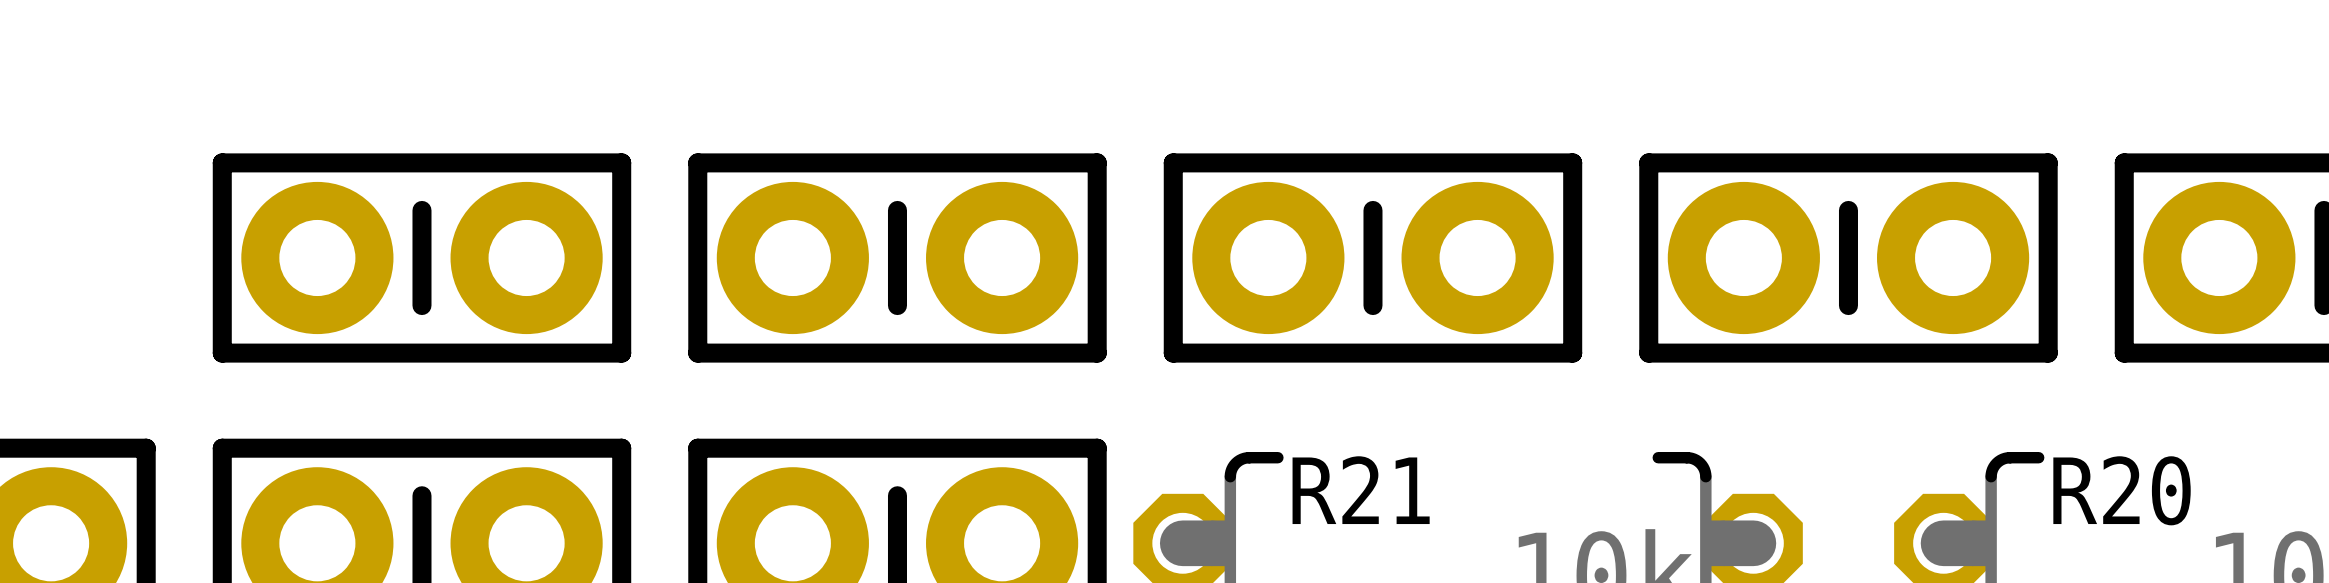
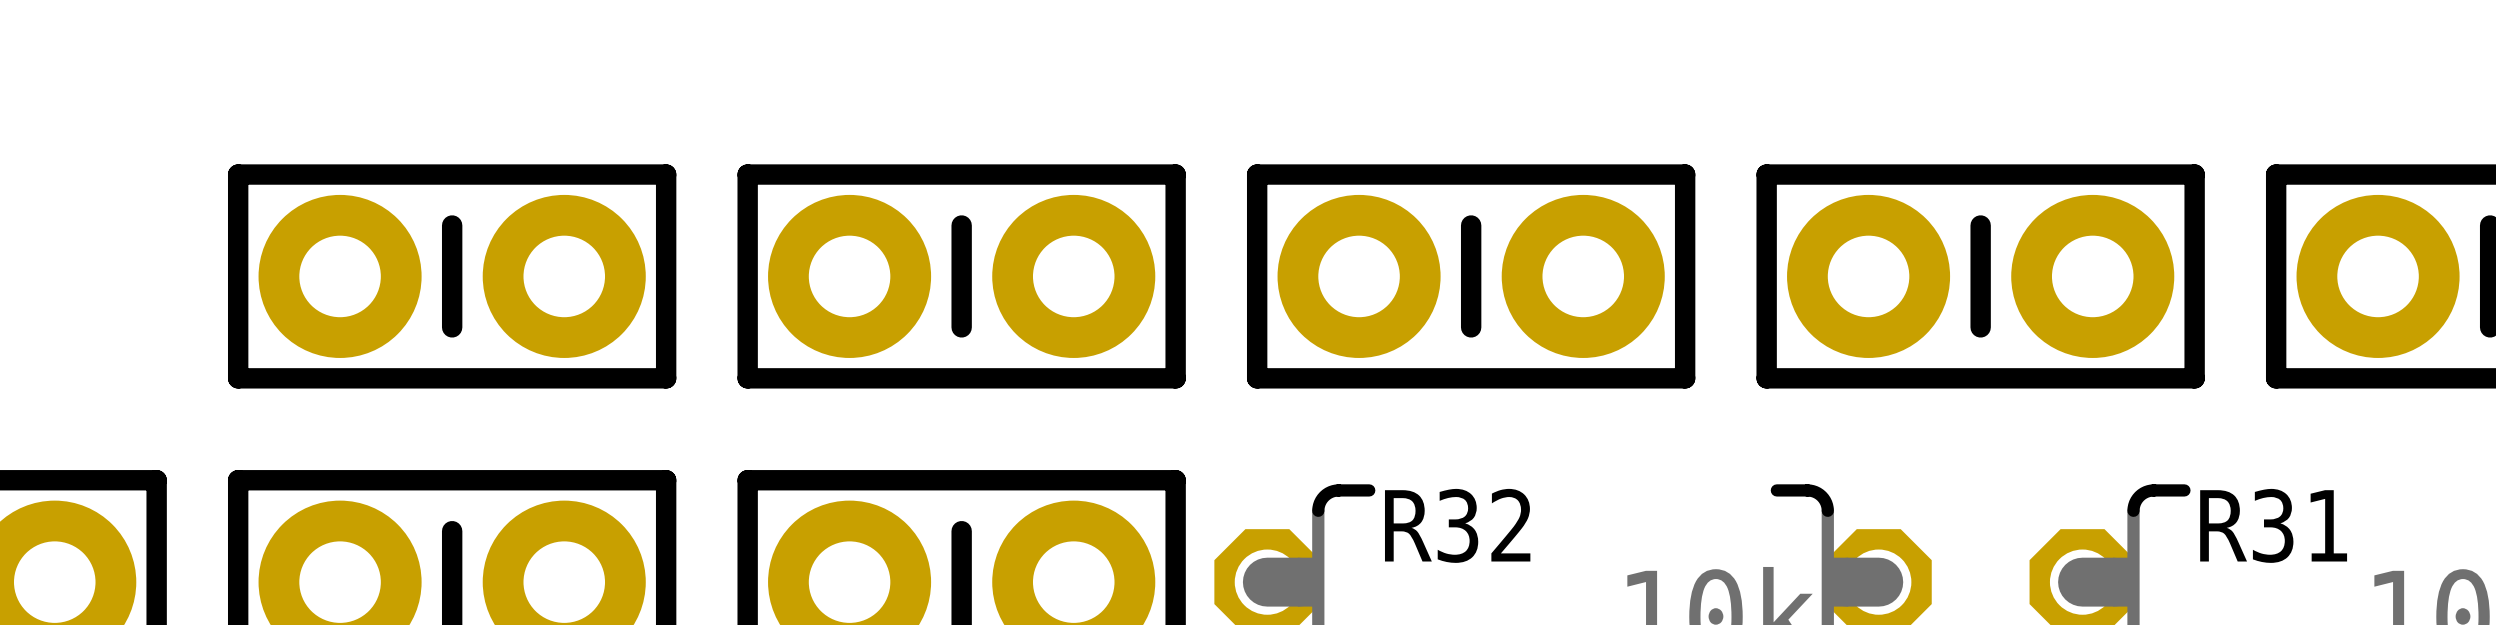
R21 name: R21 (1361, 490) -> R32 (1457, 525)
R20 name: R20 (2122, 490) -> R31 (2273, 525)

